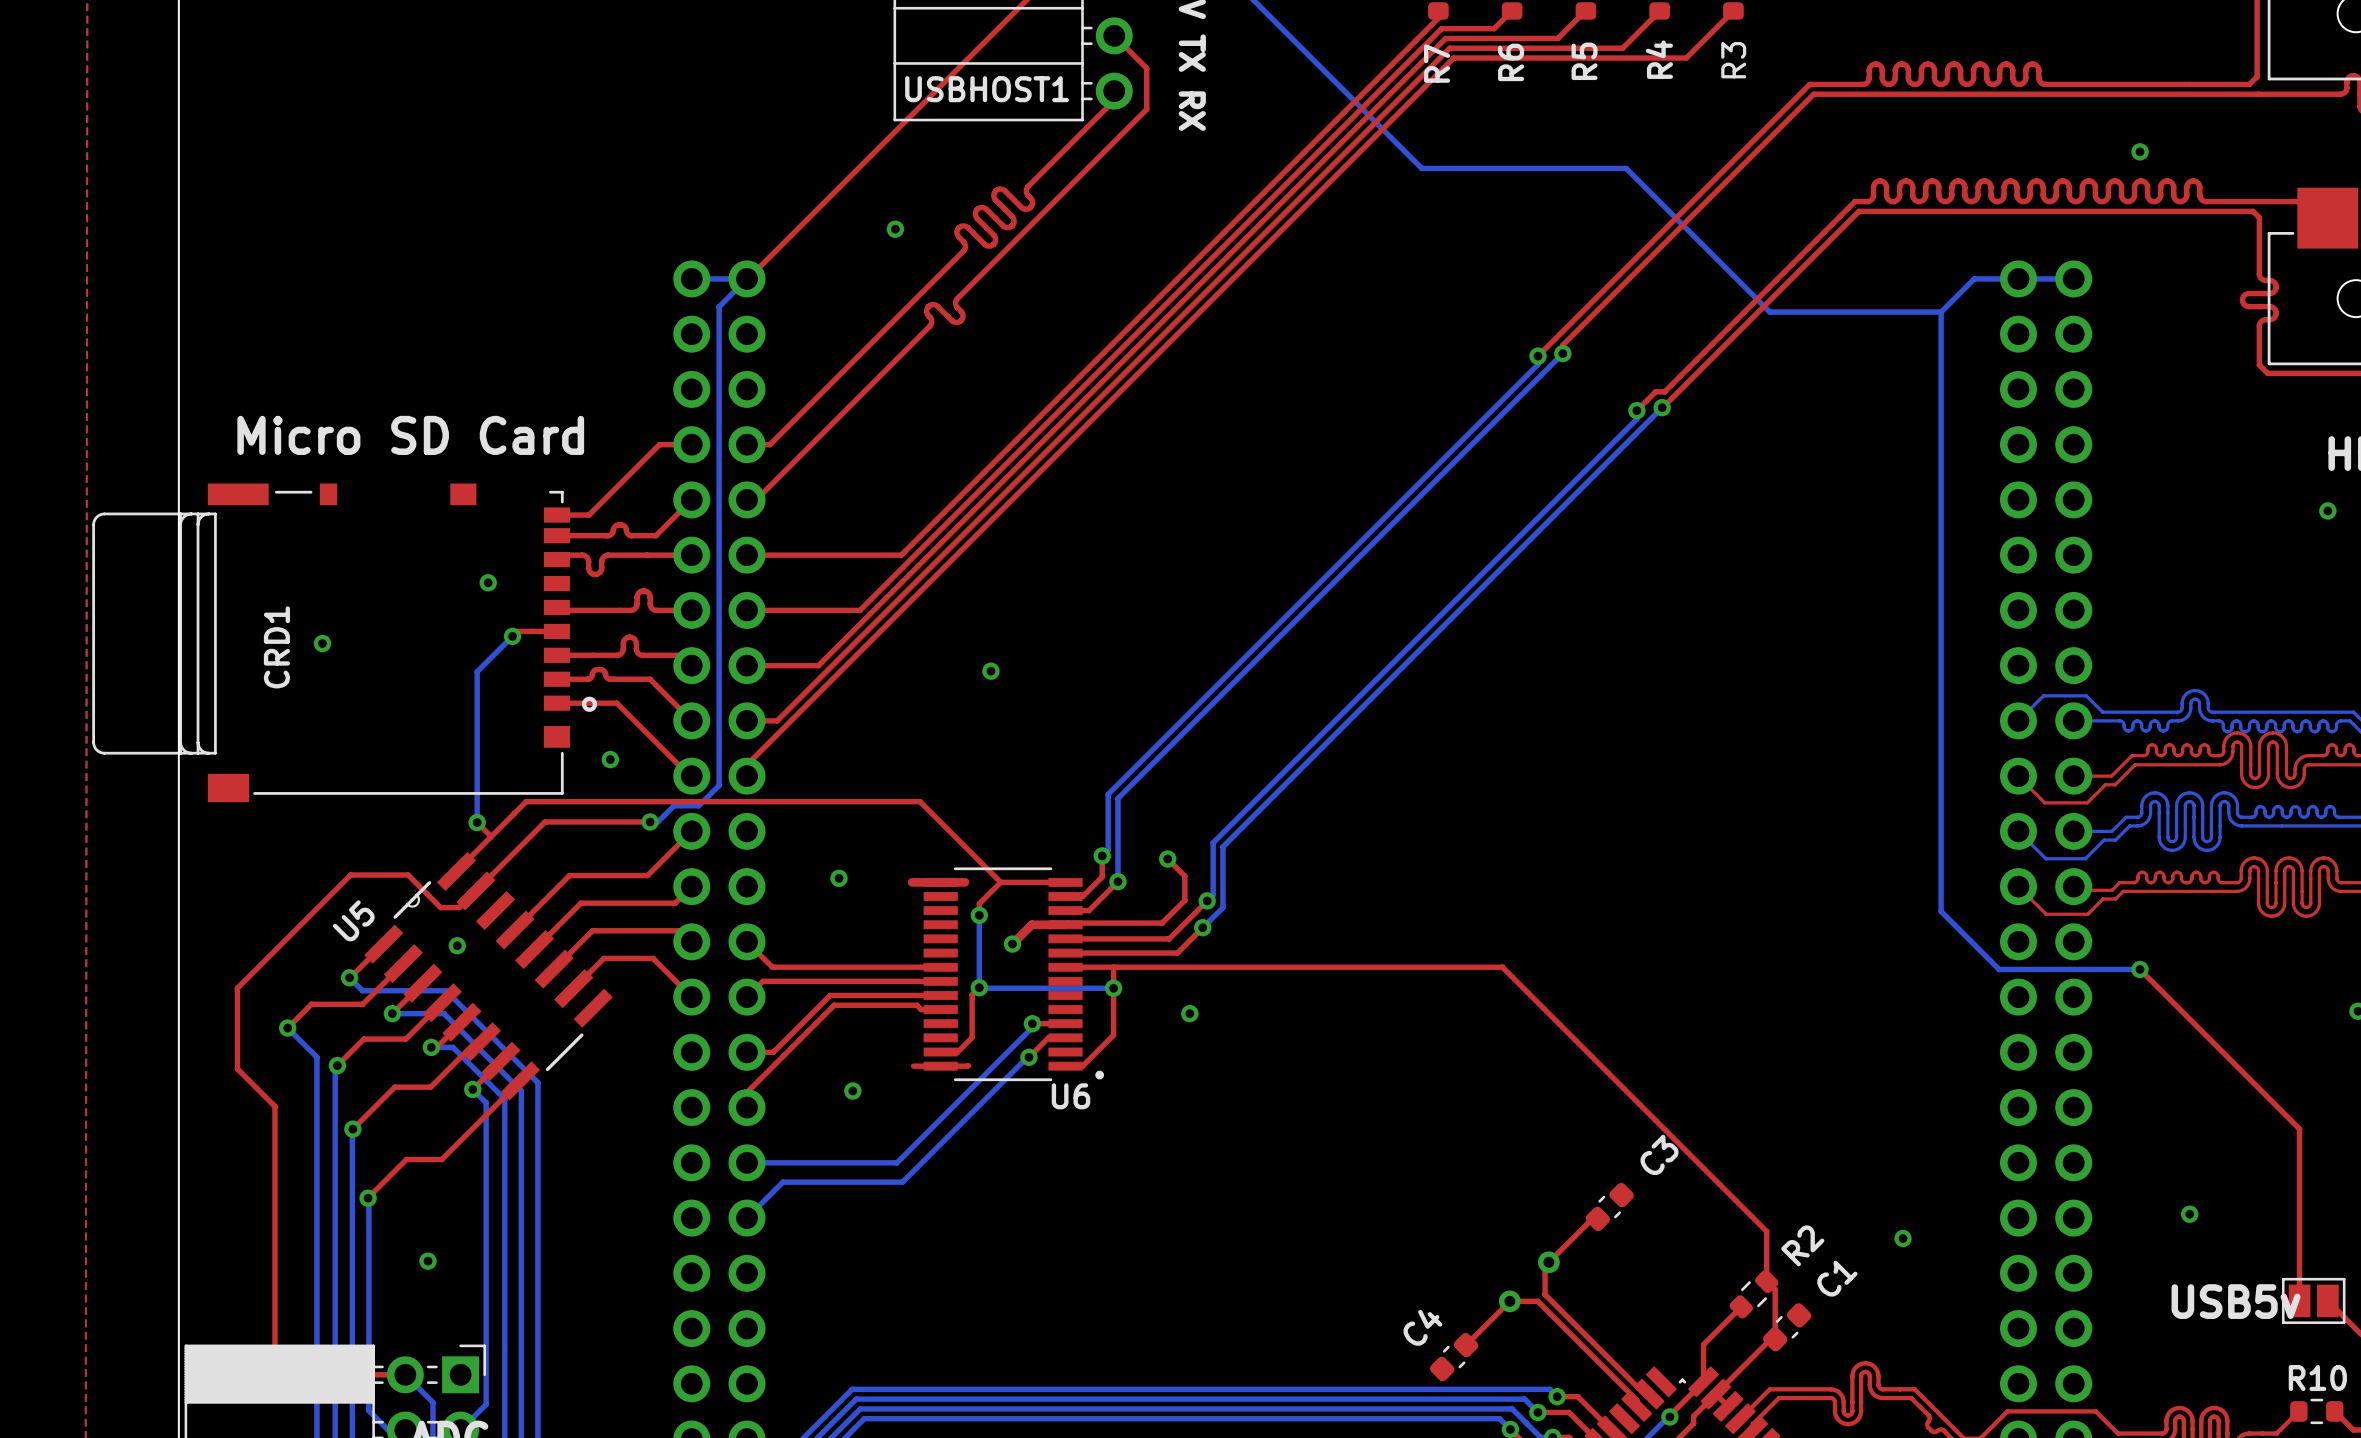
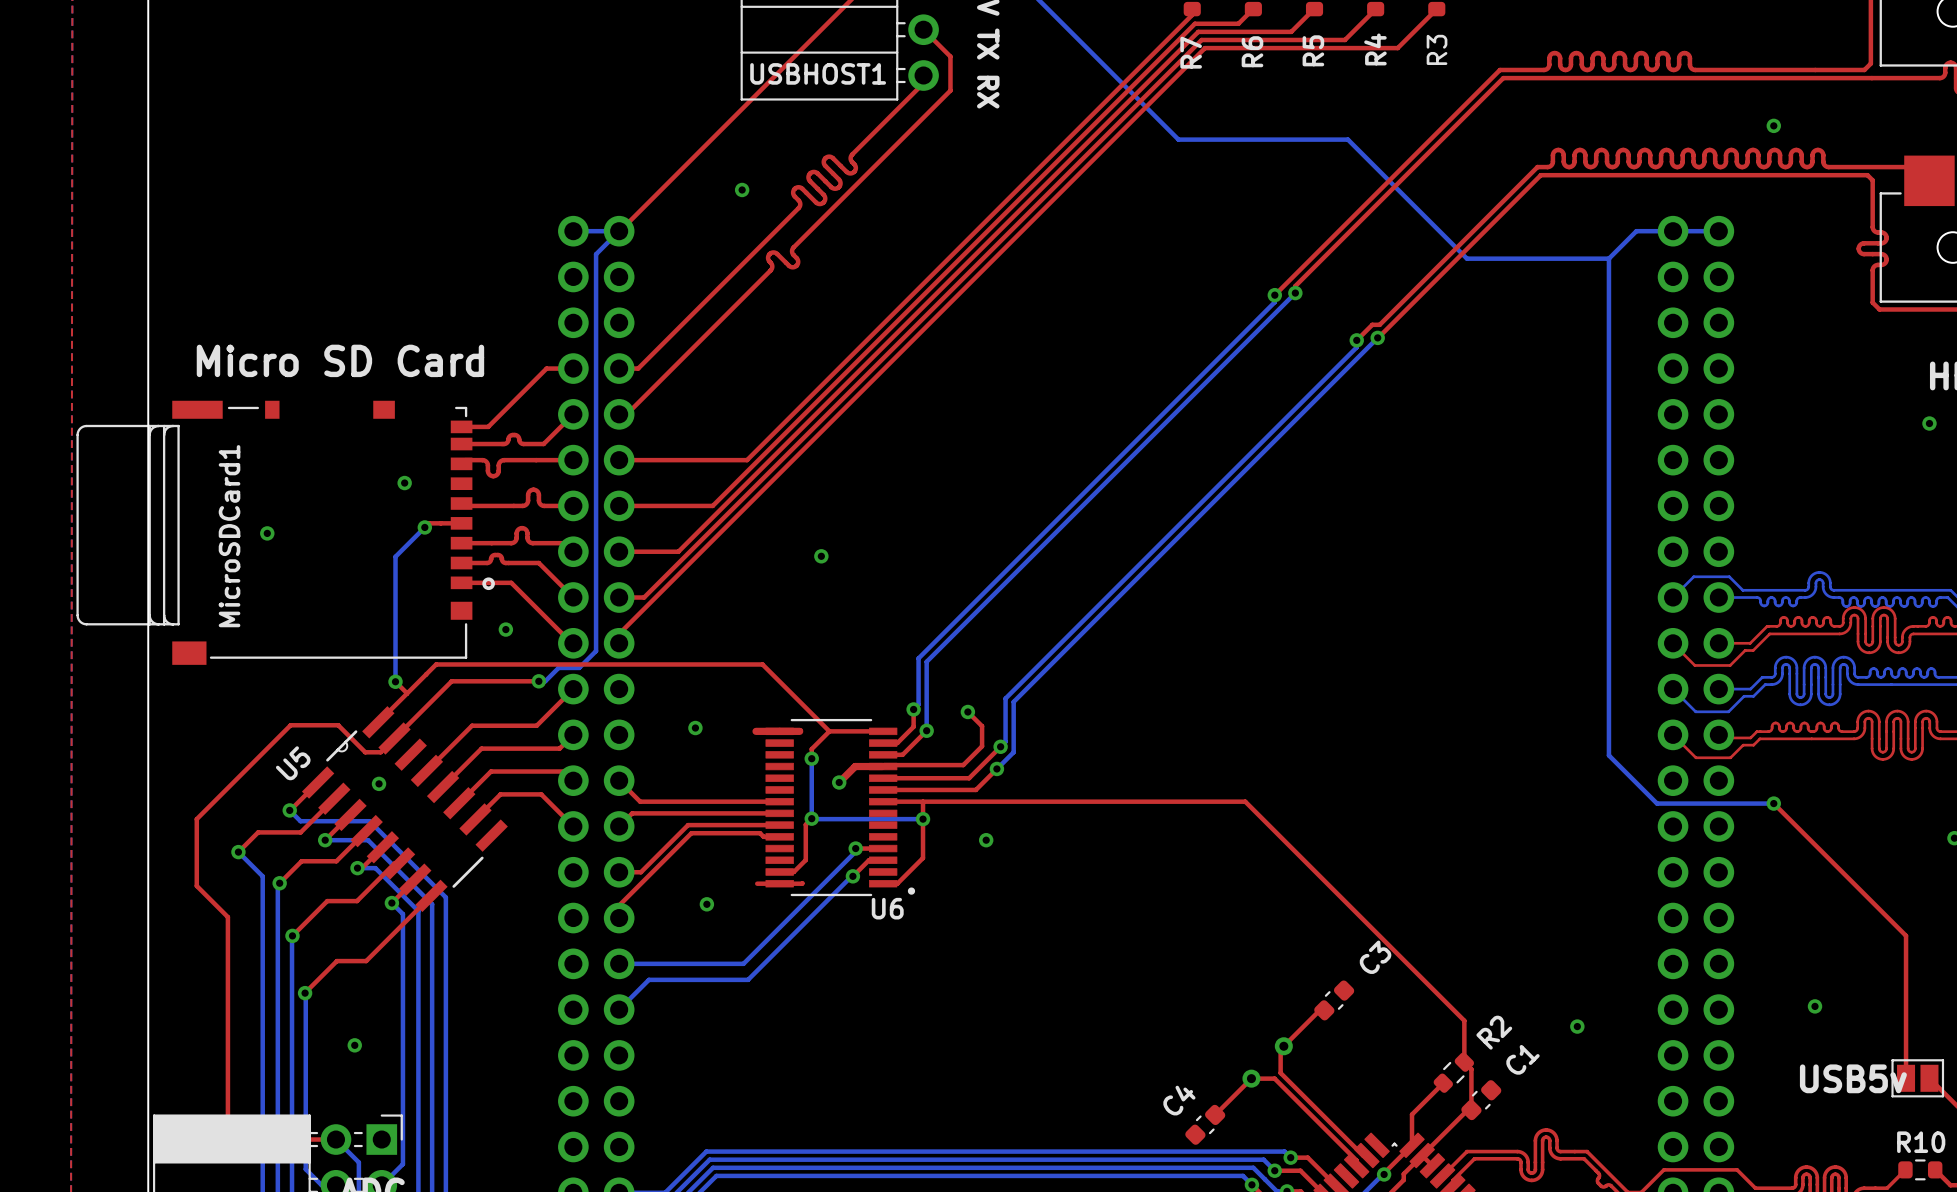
CRD1 name: CRD1 (276, 647) -> MicroSDCard1 (229, 536)

